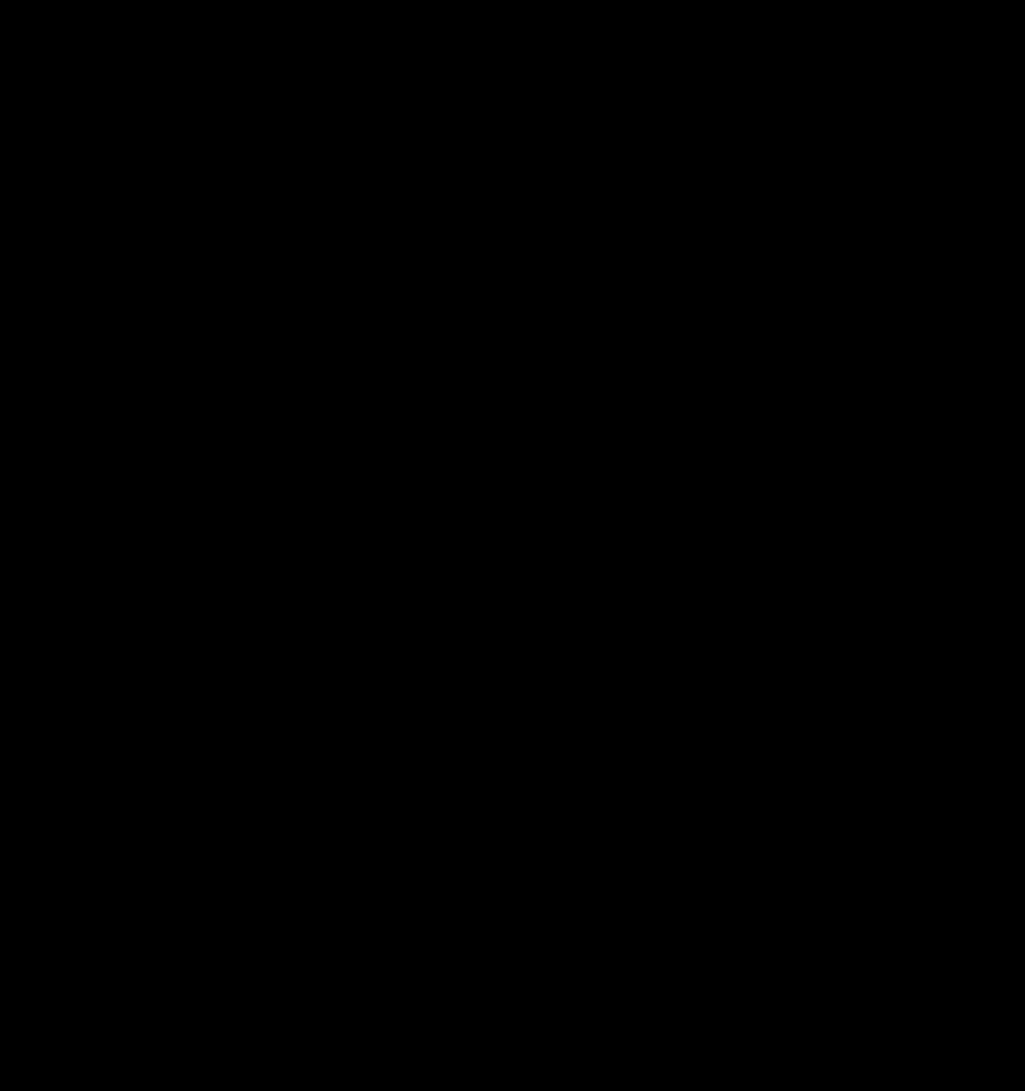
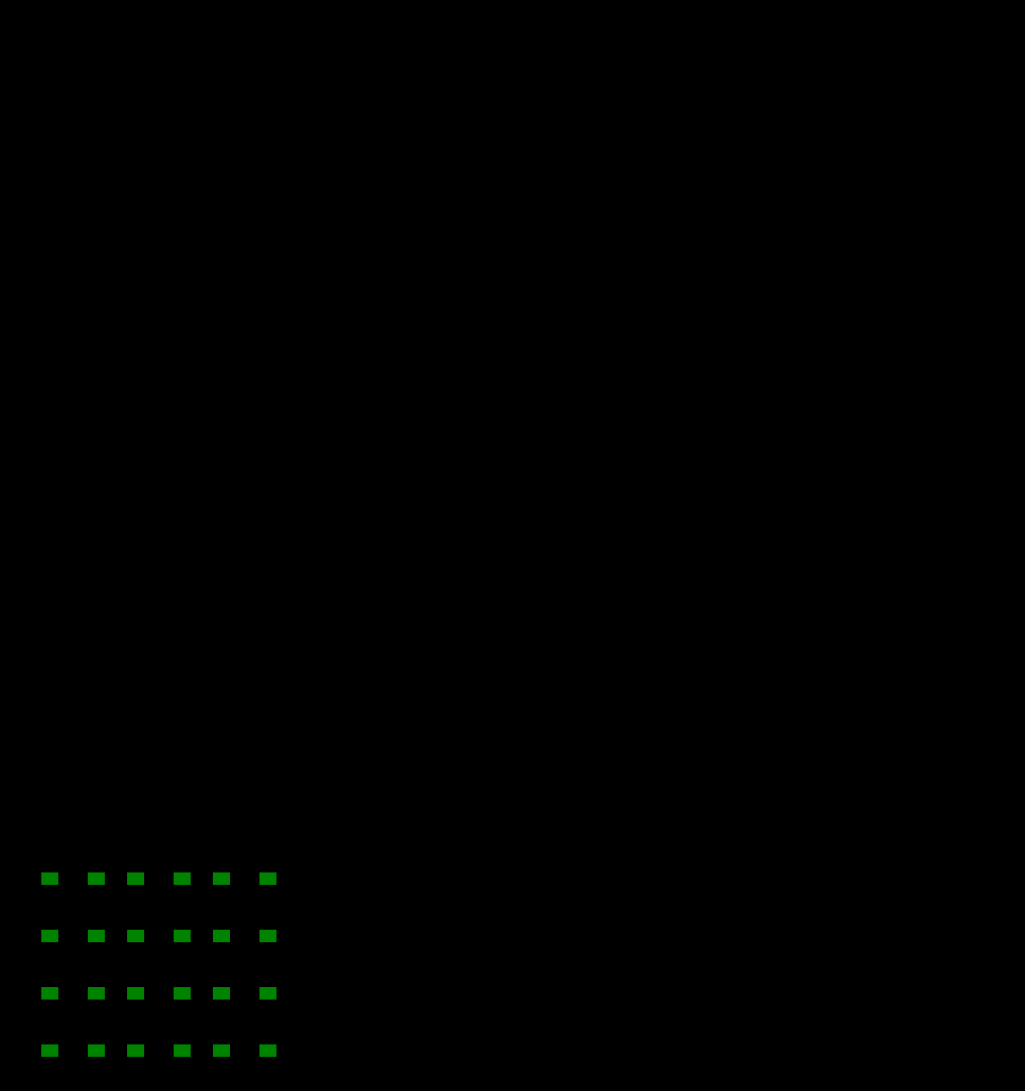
part: none -> (73, 878)
part: none -> (158, 878)
part: none -> (244, 878)
part: none -> (73, 935)
part: none -> (158, 935)
part: none -> (244, 935)
part: none -> (73, 993)
part: none -> (158, 993)
part: none -> (244, 993)
part: none -> (73, 1050)
part: none -> (158, 1050)
part: none -> (244, 1050)

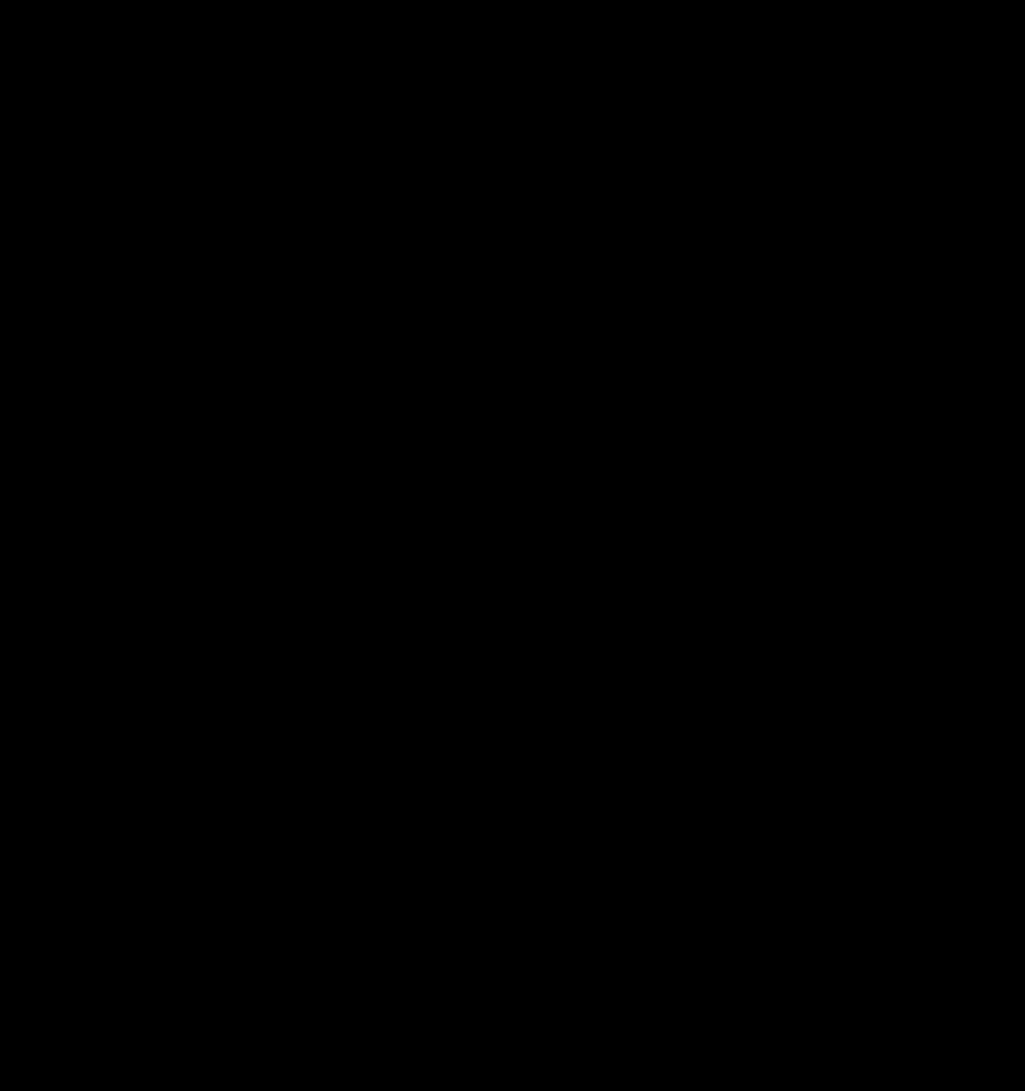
part: (73, 878) -> none
part: (158, 878) -> none
part: (244, 878) -> none
part: (73, 935) -> none
part: (158, 935) -> none
part: (244, 935) -> none
part: (73, 993) -> none
part: (158, 993) -> none
part: (244, 993) -> none
part: (73, 1050) -> none
part: (158, 1050) -> none
part: (244, 1050) -> none

